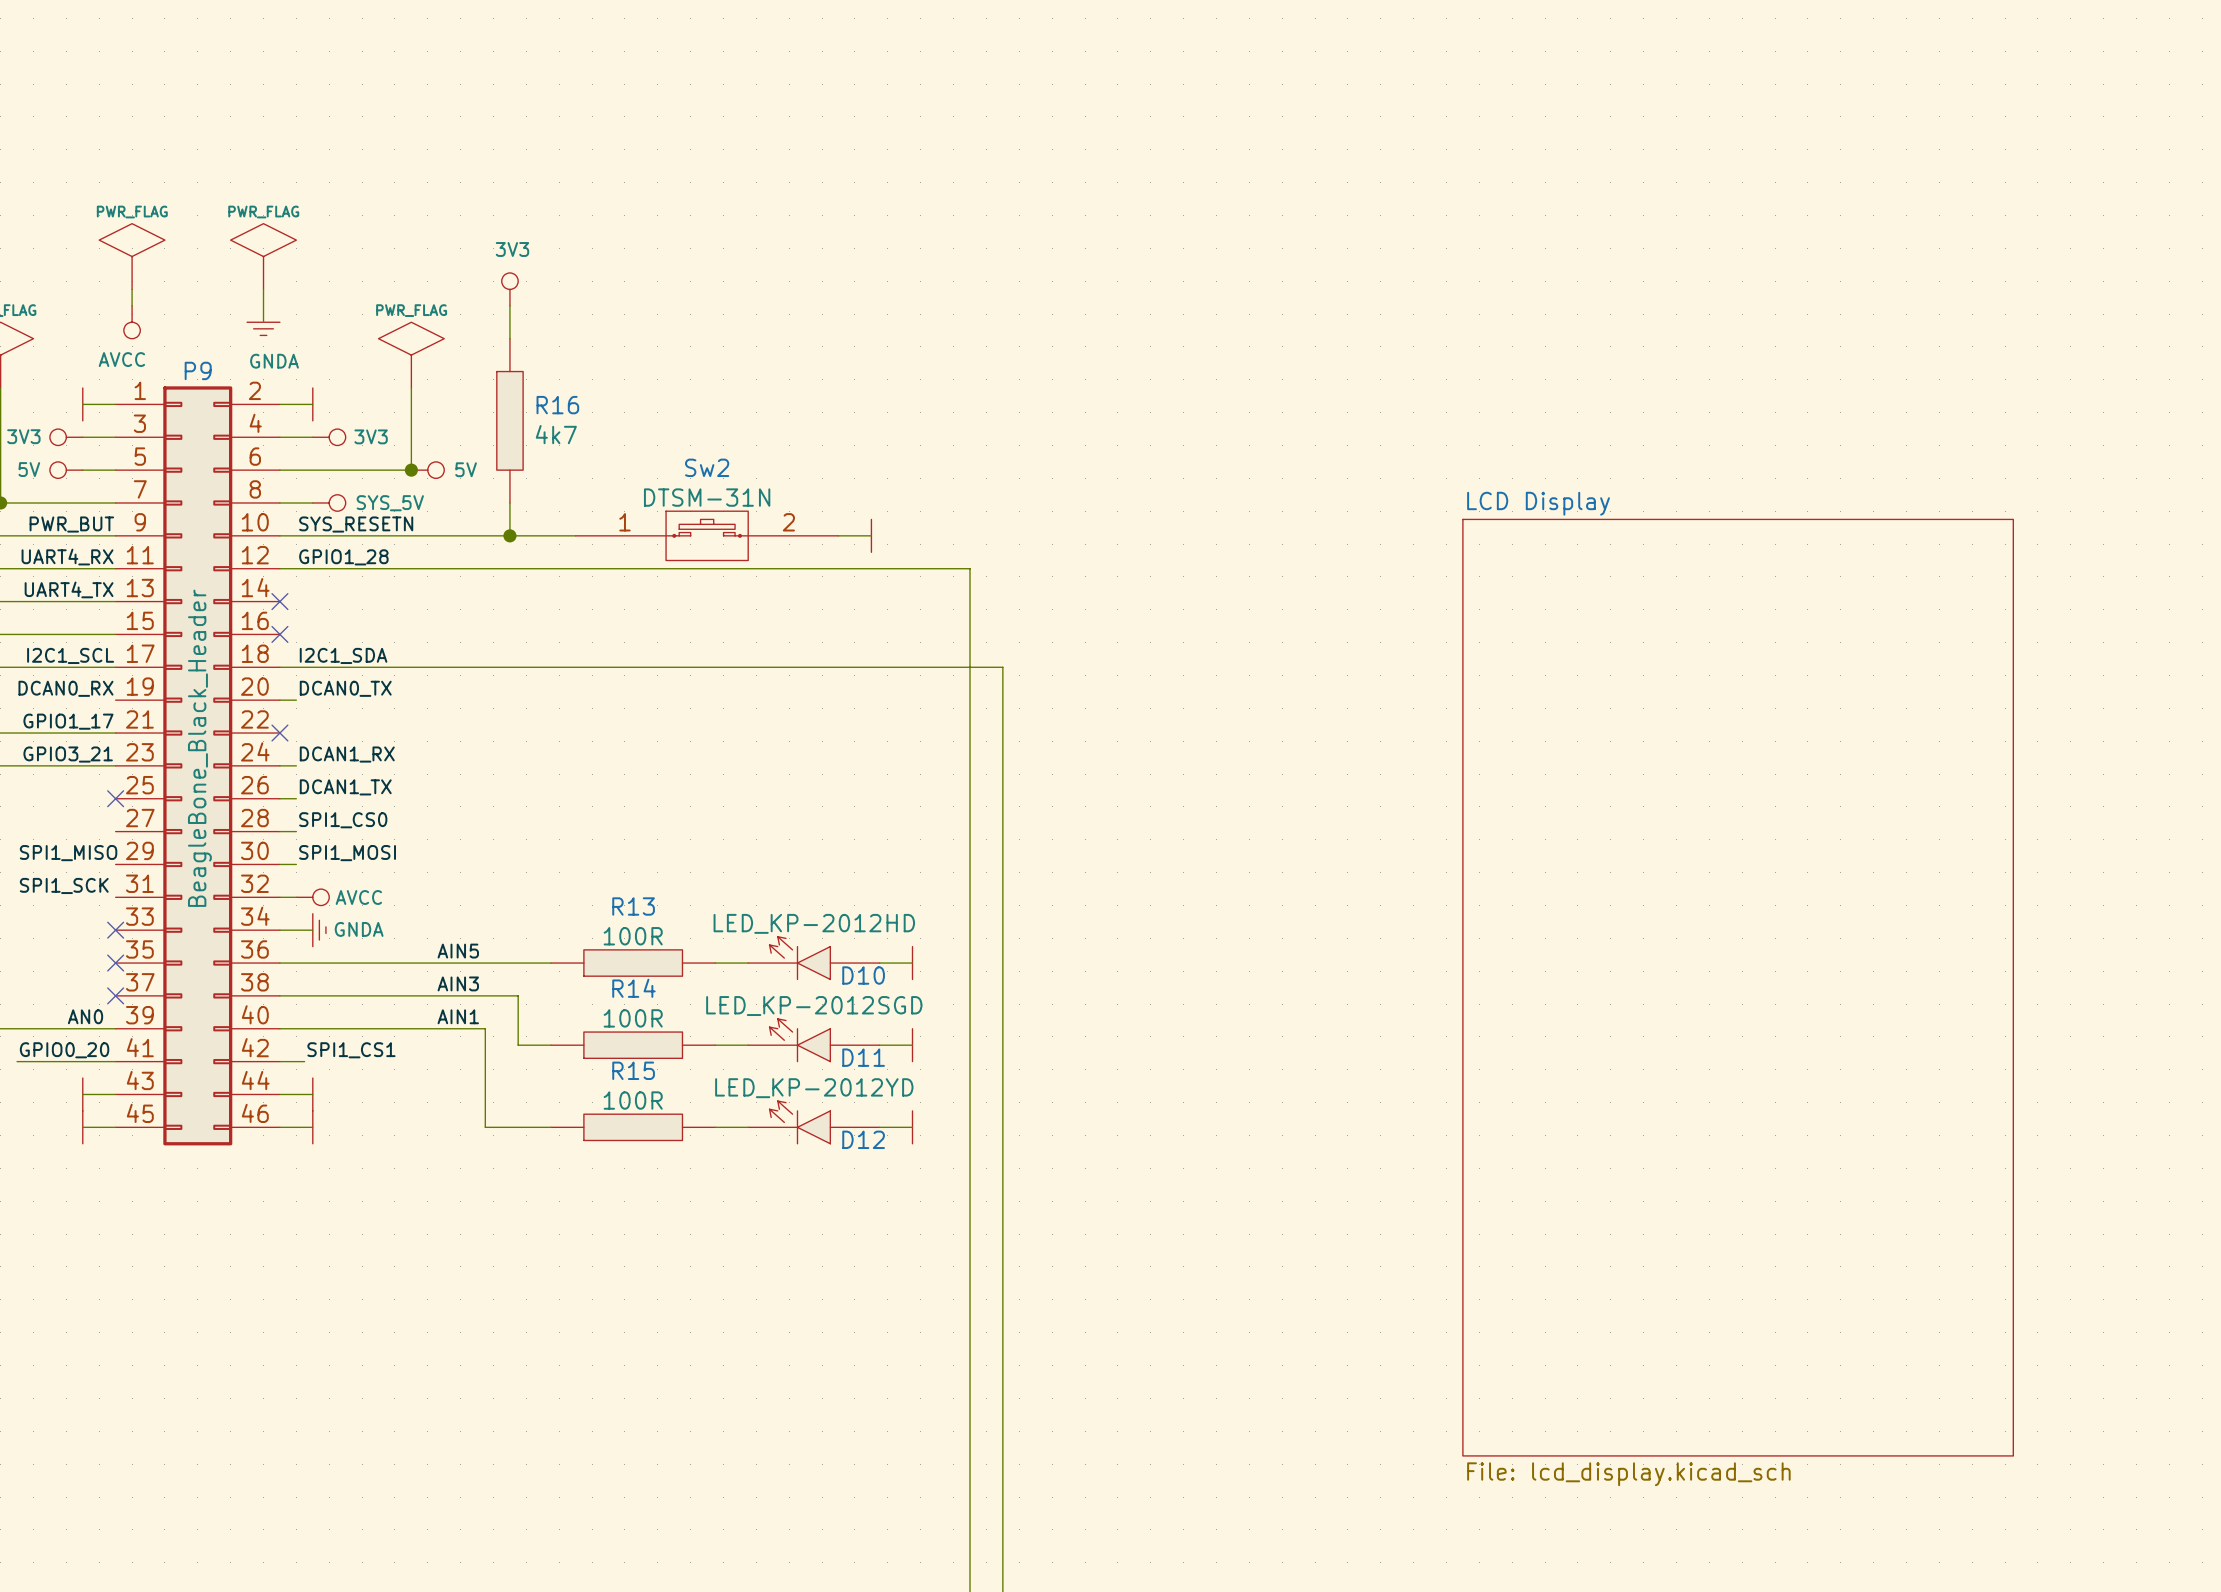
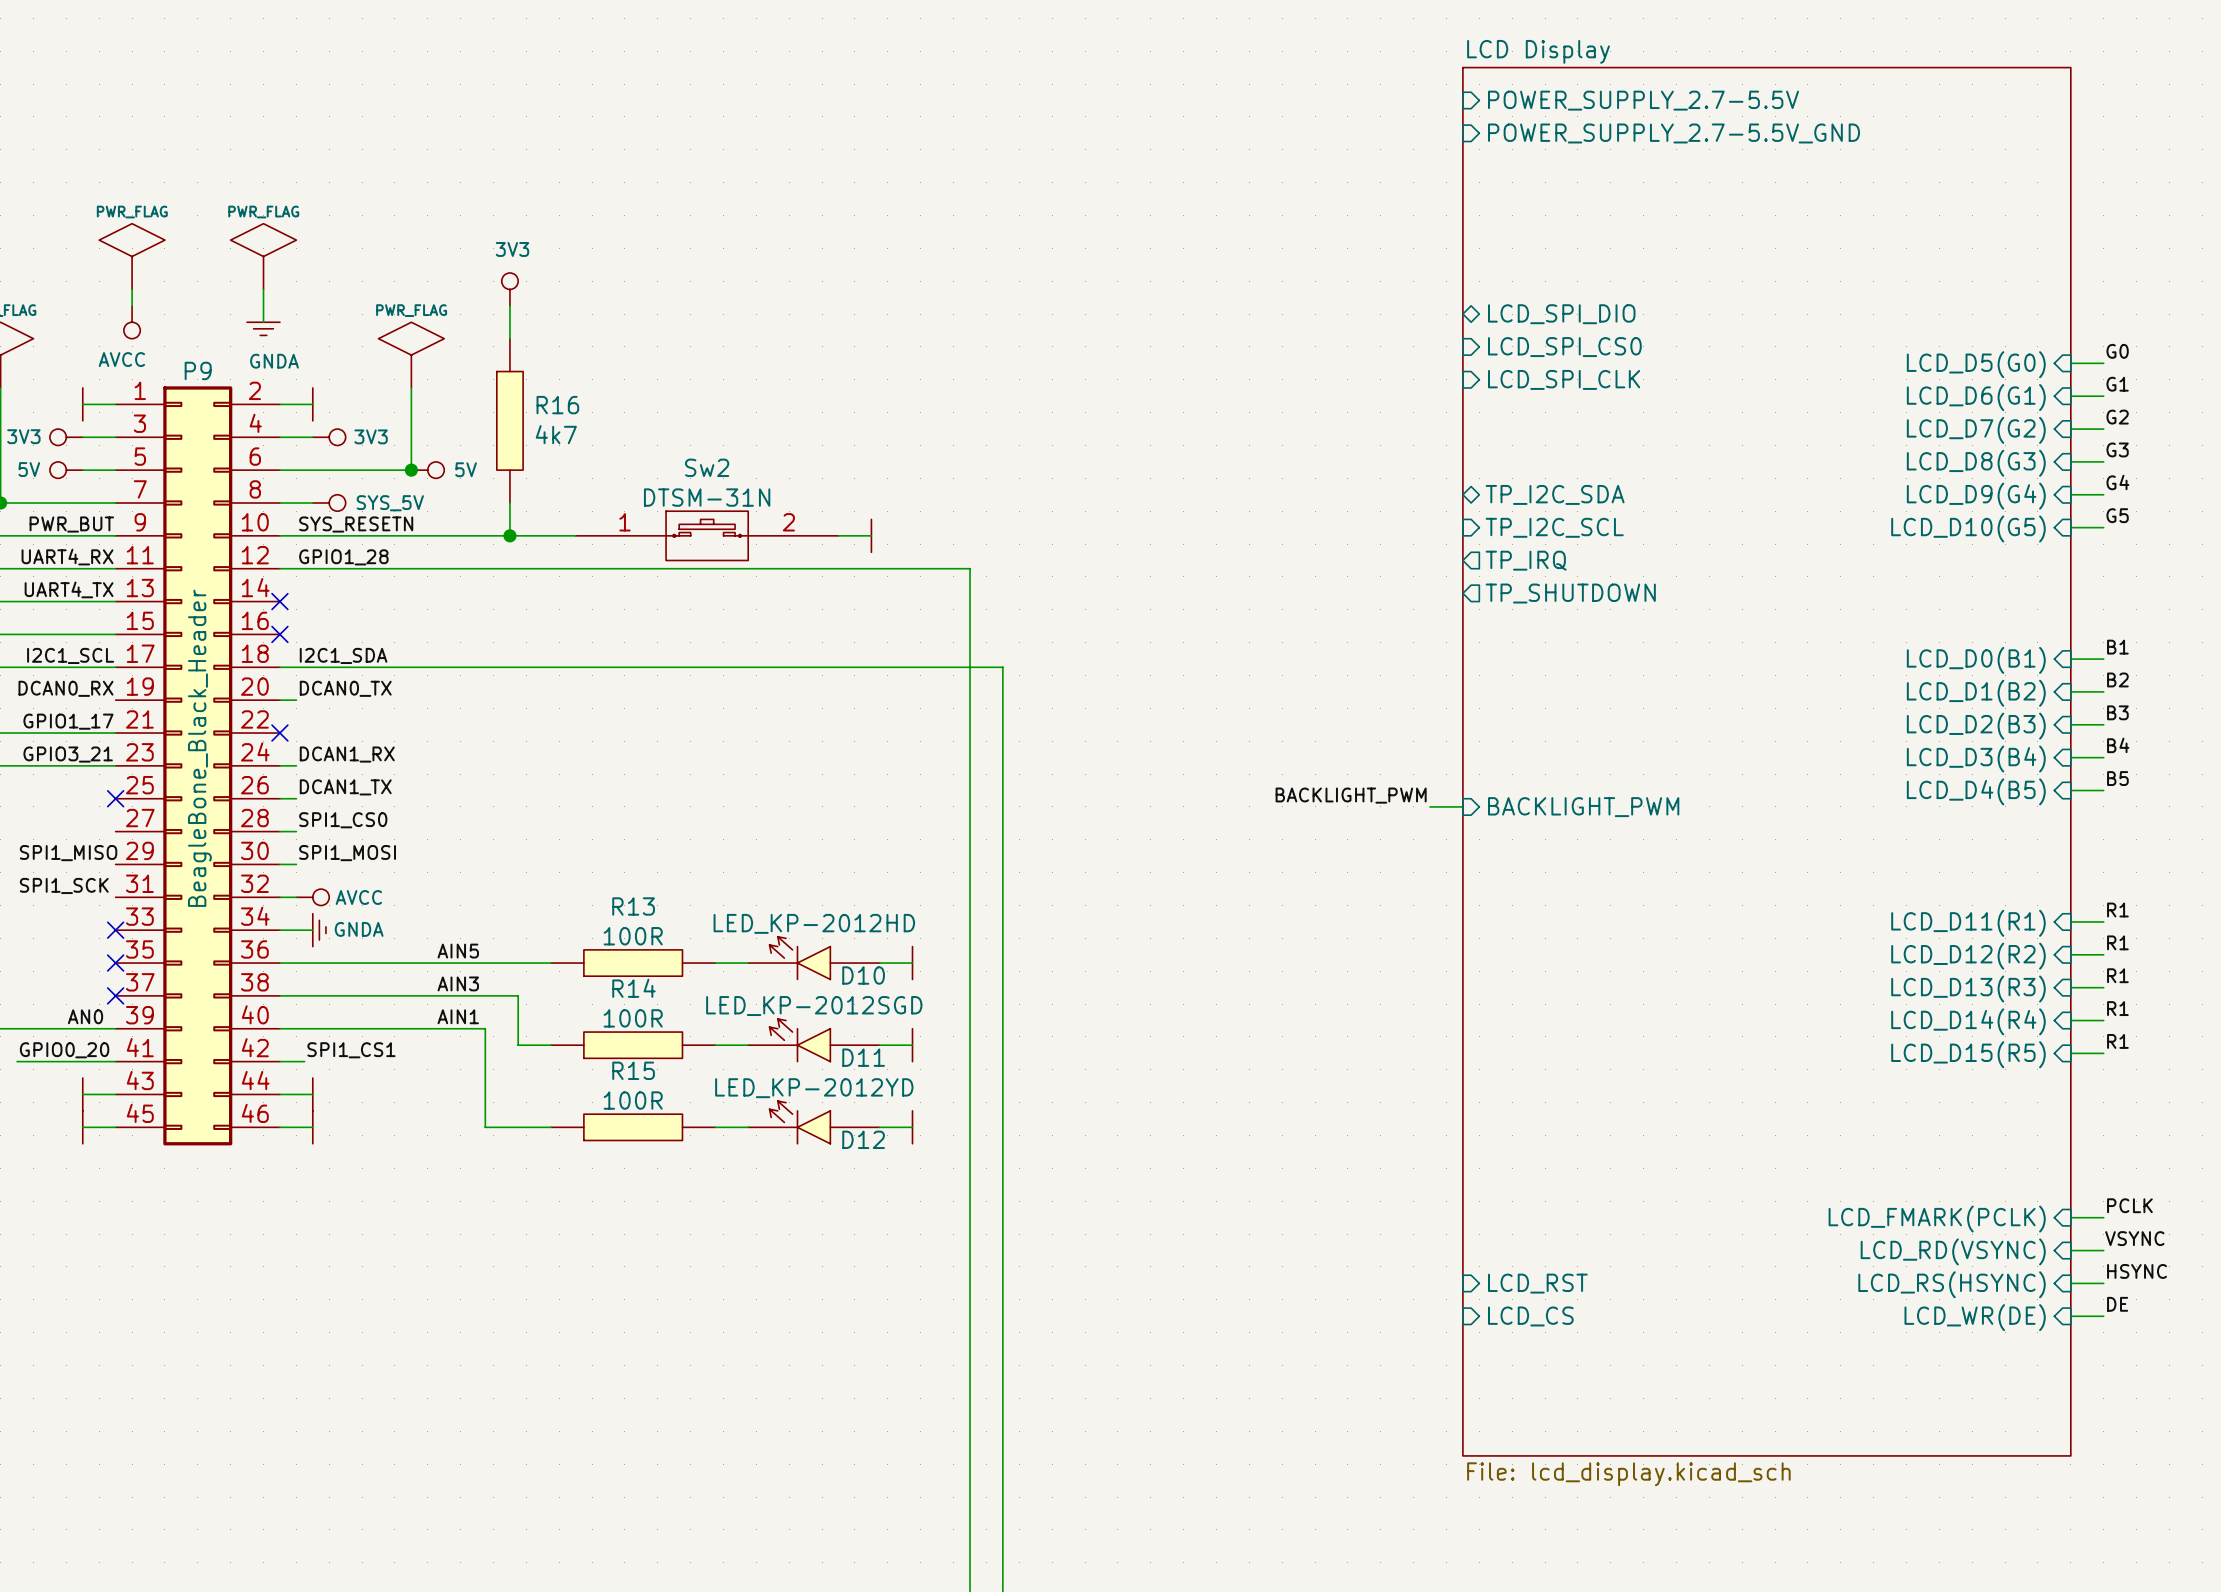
sheet pin: none -> POWER_SUPPLY_2.7-5.5V (1643, 100)
sheet pin: none -> POWER_SUPPLY_2.7-5.5V_GND (1674, 133)
sheet pin: none -> LCD_SPI_DIO (1561, 314)
sheet pin: none -> LCD_SPI_CS0 (1564, 347)
label: none -> G0 (2117, 351)
wire: none -> (2070, 363) (2103, 363)
sheet pin: none -> LCD_D5(G0) (1976, 364)
sheet pin: none -> LCD_SPI_CLK (1564, 379)
label: none -> G1 (2117, 384)
wire: none -> (2070, 396) (2103, 396)
sheet pin: none -> LCD_D6(G1) (1976, 397)
label: none -> G2 (2117, 417)
wire: none -> (2070, 429) (2103, 429)
sheet pin: none -> LCD_D7(G2) (1976, 430)
label: none -> G3 (2117, 449)
wire: none -> (2070, 461) (2103, 461)
sheet pin: none -> LCD_D8(G3) (1976, 463)
label: none -> G4 (2117, 482)
sheet pin: none -> TP_I2C_SDA (1555, 494)
wire: none -> (2070, 494) (2103, 494)
sheet pin: none -> LCD_D9(G4) (1976, 496)
label: none -> G5 (2117, 515)
sheet pin: none -> TP_I2C_SCL (1554, 527)
wire: none -> (2070, 527) (2103, 527)
sheet pin: none -> LCD_D10(G5) (1968, 528)
sheet pin: none -> TP_IRQ (1526, 560)
sheet pin: none -> TP_SHUTDOWN (1570, 593)
label: none -> B1 (2117, 647)
wire: none -> (2070, 659) (2103, 659)
sheet pin: none -> LCD_D0(B1) (1976, 660)
label: none -> B2 (2117, 679)
wire: none -> (2070, 691) (2103, 691)
sheet pin: none -> LCD_D1(B2) (1976, 693)
label: none -> B3 (2117, 712)
wire: none -> (2070, 724) (2103, 724)
sheet pin: none -> LCD_D2(B3) (1976, 726)
label: none -> B4 (2118, 745)
wire: none -> (2070, 757) (2103, 757)
sheet pin: none -> LCD_D3(B4) (1976, 759)
sheet LCD Display: none -> File: lcd_display.kicad_sch (1766, 761)
label: none -> B5 (2117, 778)
wire: none -> (2070, 790) (2103, 790)
sheet pin: none -> LCD_D4(B5) (1976, 791)
label: none -> BACKLIGHT_PWM (1351, 795)
wire: none -> (1430, 806) (1462, 806)
sheet pin: none -> BACKLIGHT_PWM (1583, 807)
label: none -> R1 (2117, 909)
wire: none -> (2070, 921) (2103, 921)
sheet pin: none -> LCD_D11(R1) (1968, 923)
label: none -> R1 (2117, 942)
wire: none -> (2070, 954) (2103, 954)
sheet pin: none -> LCD_D12(R2) (1968, 956)
label: none -> R1 (2117, 975)
sheet LCD Display: File: lcd_display.kicad_sch (1738, 987) -> none
wire: none -> (2070, 987) (2103, 987)
sheet pin: none -> LCD_D13(R3) (1968, 989)
label: none -> R1 (2117, 1008)
wire: none -> (2070, 1020) (2103, 1020)
sheet pin: none -> LCD_D14(R4) (1968, 1021)
label: none -> R1 (2117, 1041)
wire: none -> (2070, 1053) (2103, 1053)
sheet pin: none -> LCD_D15(R5) (1968, 1054)
label: none -> PCLK (2129, 1205)
wire: none -> (2070, 1217) (2103, 1217)
sheet pin: none -> LCD_FMARK(PCLK) (1937, 1219)
label: none -> VSYNC (2134, 1238)
wire: none -> (2070, 1250) (2103, 1250)
sheet pin: none -> LCD_RD(VSYNC) (1953, 1251)
label: none -> HSYNC (2137, 1271)
sheet pin: none -> LCD_RST (1537, 1283)
wire: none -> (2070, 1283) (2103, 1283)
sheet pin: none -> LCD_RS(HSYNC) (1952, 1284)
label: none -> DE (2117, 1304)
sheet pin: none -> LCD_CS (1530, 1316)
wire: none -> (2070, 1316) (2103, 1316)
sheet pin: none -> LCD_WR(DE) (1975, 1317)

